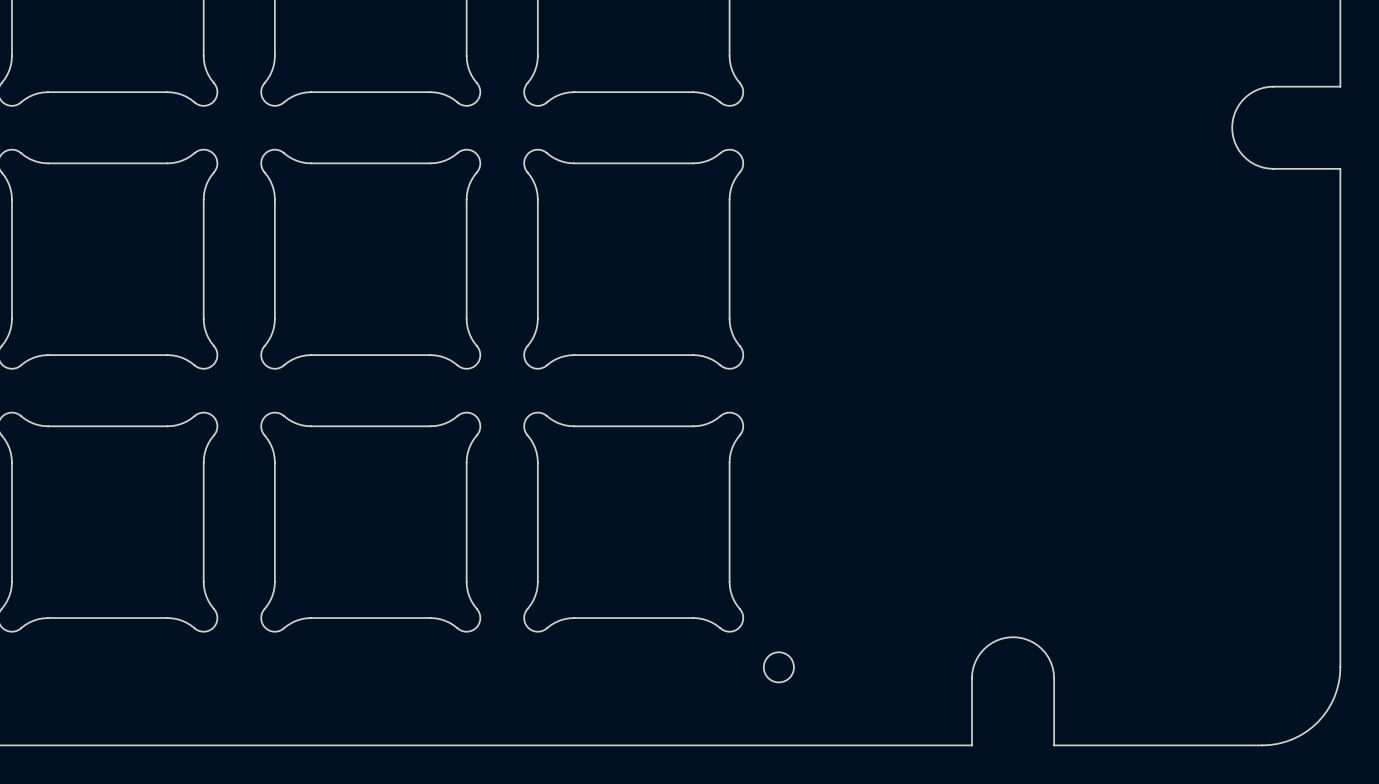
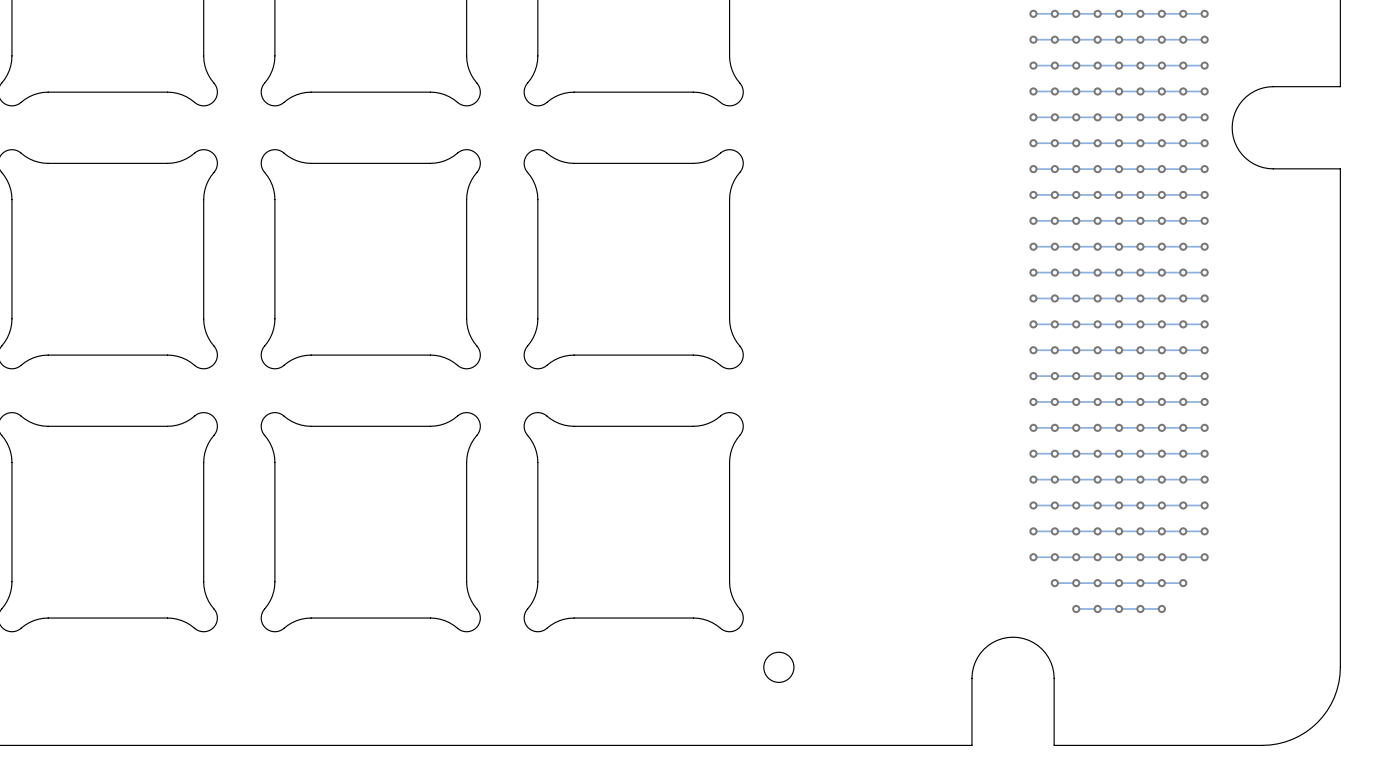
via: none -> (1033, 13)
via: none -> (1054, 13)
via: none -> (1076, 13)
via: none -> (1097, 13)
via: none -> (1119, 13)
via: none -> (1140, 13)
via: none -> (1161, 13)
via: none -> (1183, 13)
track: none -> (1204, 13) (1033, 13)
via: none -> (1204, 13)
via: none -> (1033, 39)
via: none -> (1054, 39)
via: none -> (1076, 39)
via: none -> (1097, 39)
via: none -> (1119, 39)
via: none -> (1140, 39)
via: none -> (1161, 39)
via: none -> (1183, 39)
track: none -> (1204, 39) (1033, 39)
via: none -> (1204, 39)
via: none -> (1033, 65)
via: none -> (1054, 65)
via: none -> (1076, 65)
via: none -> (1097, 65)
via: none -> (1119, 65)
via: none -> (1140, 65)
via: none -> (1161, 65)
via: none -> (1183, 65)
track: none -> (1204, 65) (1033, 65)
via: none -> (1204, 65)
via: none -> (1033, 91)
via: none -> (1054, 91)
via: none -> (1076, 91)
via: none -> (1097, 91)
via: none -> (1119, 91)
via: none -> (1140, 91)
via: none -> (1161, 91)
via: none -> (1183, 91)
track: none -> (1204, 91) (1033, 91)
via: none -> (1204, 91)
via: none -> (1033, 117)
via: none -> (1054, 117)
via: none -> (1076, 117)
via: none -> (1097, 117)
via: none -> (1119, 117)
via: none -> (1140, 117)
via: none -> (1161, 117)
via: none -> (1183, 117)
track: none -> (1204, 117) (1033, 117)
via: none -> (1204, 117)
via: none -> (1033, 143)
via: none -> (1054, 143)
via: none -> (1076, 143)
via: none -> (1097, 143)
via: none -> (1119, 143)
via: none -> (1140, 143)
via: none -> (1161, 143)
via: none -> (1183, 143)
track: none -> (1204, 143) (1033, 143)
via: none -> (1204, 143)
via: none -> (1033, 169)
via: none -> (1054, 169)
via: none -> (1076, 169)
via: none -> (1097, 169)
via: none -> (1119, 169)
via: none -> (1140, 169)
via: none -> (1161, 169)
via: none -> (1183, 169)
track: none -> (1204, 169) (1033, 169)
via: none -> (1204, 169)
via: none -> (1033, 194)
via: none -> (1054, 194)
via: none -> (1076, 194)
via: none -> (1097, 194)
via: none -> (1119, 194)
via: none -> (1140, 194)
via: none -> (1161, 194)
via: none -> (1183, 194)
track: none -> (1204, 194) (1033, 194)
via: none -> (1204, 194)
via: none -> (1033, 220)
via: none -> (1054, 220)
via: none -> (1076, 220)
via: none -> (1097, 220)
via: none -> (1119, 220)
via: none -> (1140, 220)
via: none -> (1161, 220)
via: none -> (1183, 220)
track: none -> (1204, 220) (1033, 220)
via: none -> (1204, 220)
via: none -> (1033, 246)
via: none -> (1054, 246)
via: none -> (1076, 246)
via: none -> (1097, 246)
via: none -> (1119, 246)
via: none -> (1140, 246)
via: none -> (1161, 246)
via: none -> (1183, 246)
track: none -> (1204, 246) (1033, 246)
via: none -> (1204, 246)
via: none -> (1033, 272)
via: none -> (1054, 272)
via: none -> (1076, 272)
via: none -> (1097, 272)
via: none -> (1119, 272)
via: none -> (1140, 272)
via: none -> (1161, 272)
via: none -> (1183, 272)
track: none -> (1204, 272) (1033, 272)
via: none -> (1204, 272)
via: none -> (1033, 298)
via: none -> (1054, 298)
via: none -> (1076, 298)
via: none -> (1097, 298)
via: none -> (1119, 298)
via: none -> (1140, 298)
via: none -> (1161, 298)
via: none -> (1183, 298)
track: none -> (1204, 298) (1033, 298)
via: none -> (1204, 298)
via: none -> (1033, 324)
via: none -> (1054, 324)
via: none -> (1076, 324)
via: none -> (1097, 324)
via: none -> (1119, 324)
via: none -> (1140, 324)
via: none -> (1161, 324)
via: none -> (1183, 324)
track: none -> (1204, 324) (1033, 324)
via: none -> (1204, 324)
via: none -> (1033, 350)
via: none -> (1054, 350)
via: none -> (1076, 350)
via: none -> (1097, 350)
via: none -> (1119, 350)
via: none -> (1140, 350)
via: none -> (1161, 350)
via: none -> (1183, 350)
track: none -> (1204, 350) (1033, 350)
via: none -> (1204, 350)
via: none -> (1033, 376)
via: none -> (1054, 376)
via: none -> (1076, 376)
via: none -> (1097, 376)
via: none -> (1119, 376)
via: none -> (1140, 376)
via: none -> (1161, 376)
via: none -> (1183, 376)
track: none -> (1204, 376) (1033, 376)
via: none -> (1204, 376)
via: none -> (1033, 401)
via: none -> (1054, 401)
via: none -> (1076, 401)
via: none -> (1097, 401)
via: none -> (1119, 401)
via: none -> (1140, 401)
via: none -> (1161, 401)
via: none -> (1183, 401)
track: none -> (1204, 401) (1033, 401)
via: none -> (1204, 401)
via: none -> (1033, 427)
via: none -> (1054, 427)
via: none -> (1076, 427)
via: none -> (1097, 427)
via: none -> (1119, 427)
via: none -> (1140, 427)
via: none -> (1161, 427)
via: none -> (1183, 427)
track: none -> (1204, 427) (1033, 427)
via: none -> (1204, 427)
via: none -> (1033, 453)
via: none -> (1054, 453)
via: none -> (1076, 453)
via: none -> (1097, 453)
via: none -> (1119, 453)
via: none -> (1140, 453)
via: none -> (1161, 453)
via: none -> (1183, 453)
track: none -> (1204, 453) (1033, 453)
via: none -> (1204, 453)
via: none -> (1033, 479)
via: none -> (1054, 479)
via: none -> (1076, 479)
via: none -> (1097, 479)
via: none -> (1119, 479)
via: none -> (1140, 479)
via: none -> (1161, 479)
via: none -> (1183, 479)
track: none -> (1204, 479) (1033, 479)
via: none -> (1204, 479)
via: none -> (1033, 505)
via: none -> (1054, 505)
via: none -> (1076, 505)
via: none -> (1097, 505)
via: none -> (1119, 505)
via: none -> (1140, 505)
via: none -> (1161, 505)
via: none -> (1183, 505)
track: none -> (1204, 505) (1033, 505)
via: none -> (1204, 505)
via: none -> (1033, 531)
via: none -> (1054, 531)
via: none -> (1076, 531)
via: none -> (1097, 531)
via: none -> (1119, 531)
via: none -> (1140, 531)
via: none -> (1161, 531)
via: none -> (1183, 531)
track: none -> (1204, 531) (1033, 531)
via: none -> (1204, 531)
via: none -> (1033, 557)
via: none -> (1054, 557)
via: none -> (1076, 557)
via: none -> (1097, 557)
via: none -> (1119, 557)
via: none -> (1140, 557)
via: none -> (1161, 557)
via: none -> (1183, 557)
track: none -> (1204, 557) (1033, 557)
via: none -> (1204, 557)
via: none -> (1054, 583)
via: none -> (1076, 583)
via: none -> (1097, 583)
via: none -> (1119, 583)
via: none -> (1140, 583)
via: none -> (1161, 583)
track: none -> (1183, 583) (1054, 583)
via: none -> (1183, 583)
via: none -> (1076, 608)
via: none -> (1097, 608)
via: none -> (1119, 608)
via: none -> (1140, 608)
track: none -> (1161, 608) (1076, 608)
via: none -> (1161, 608)

